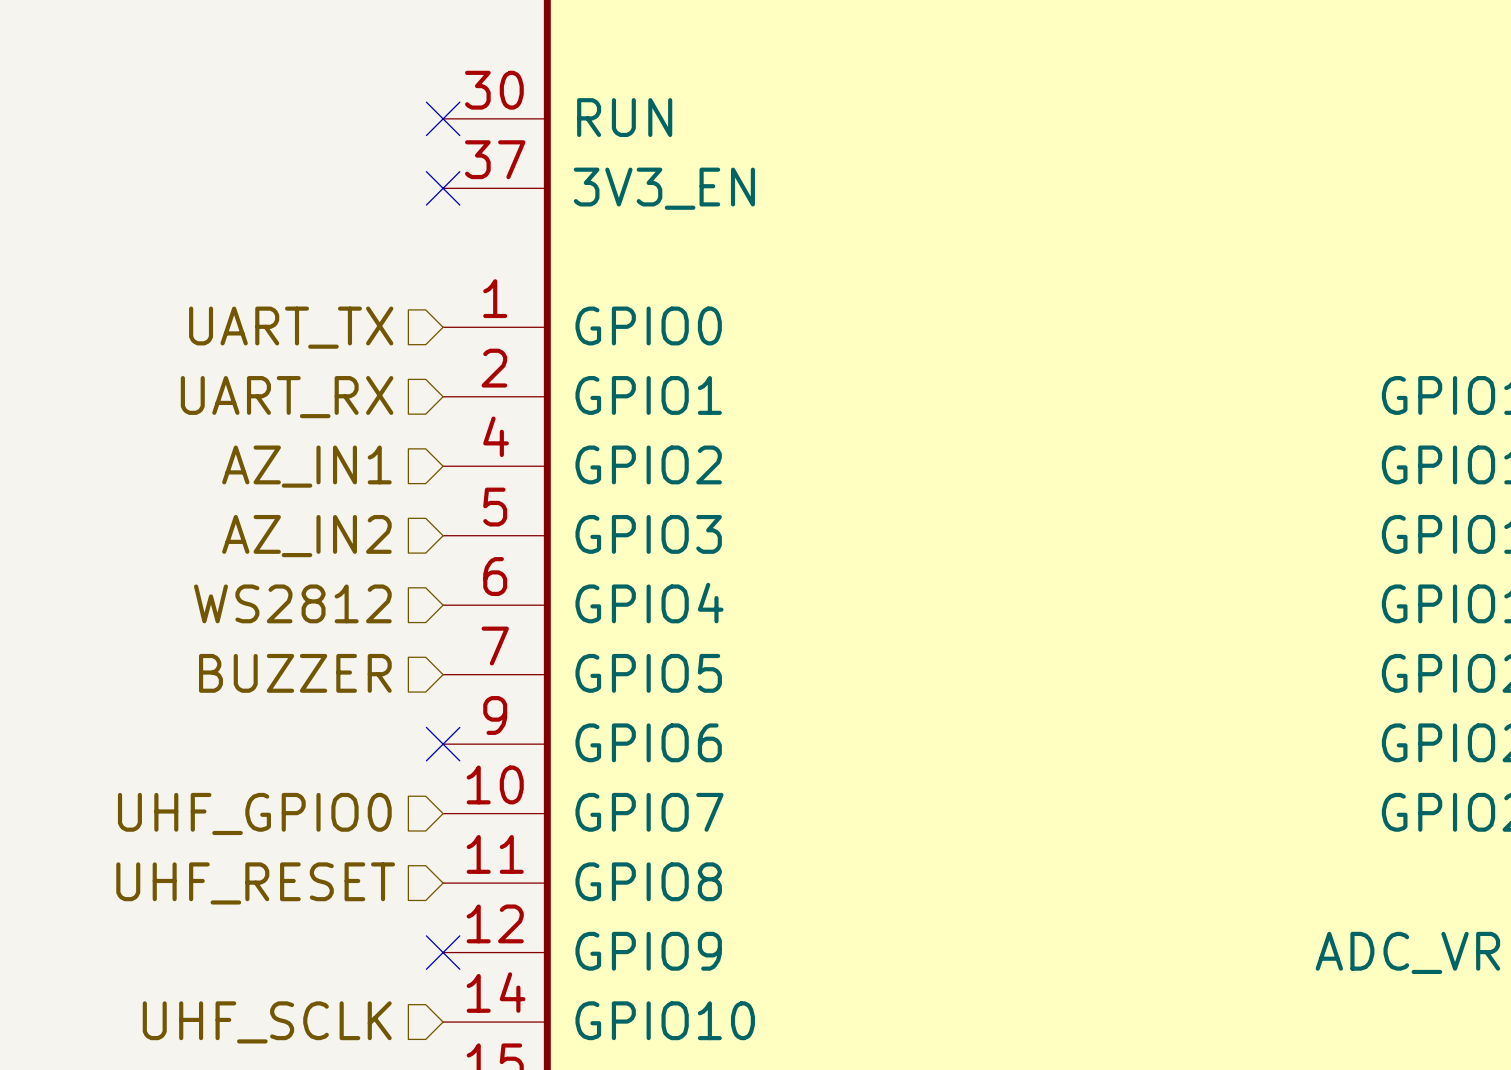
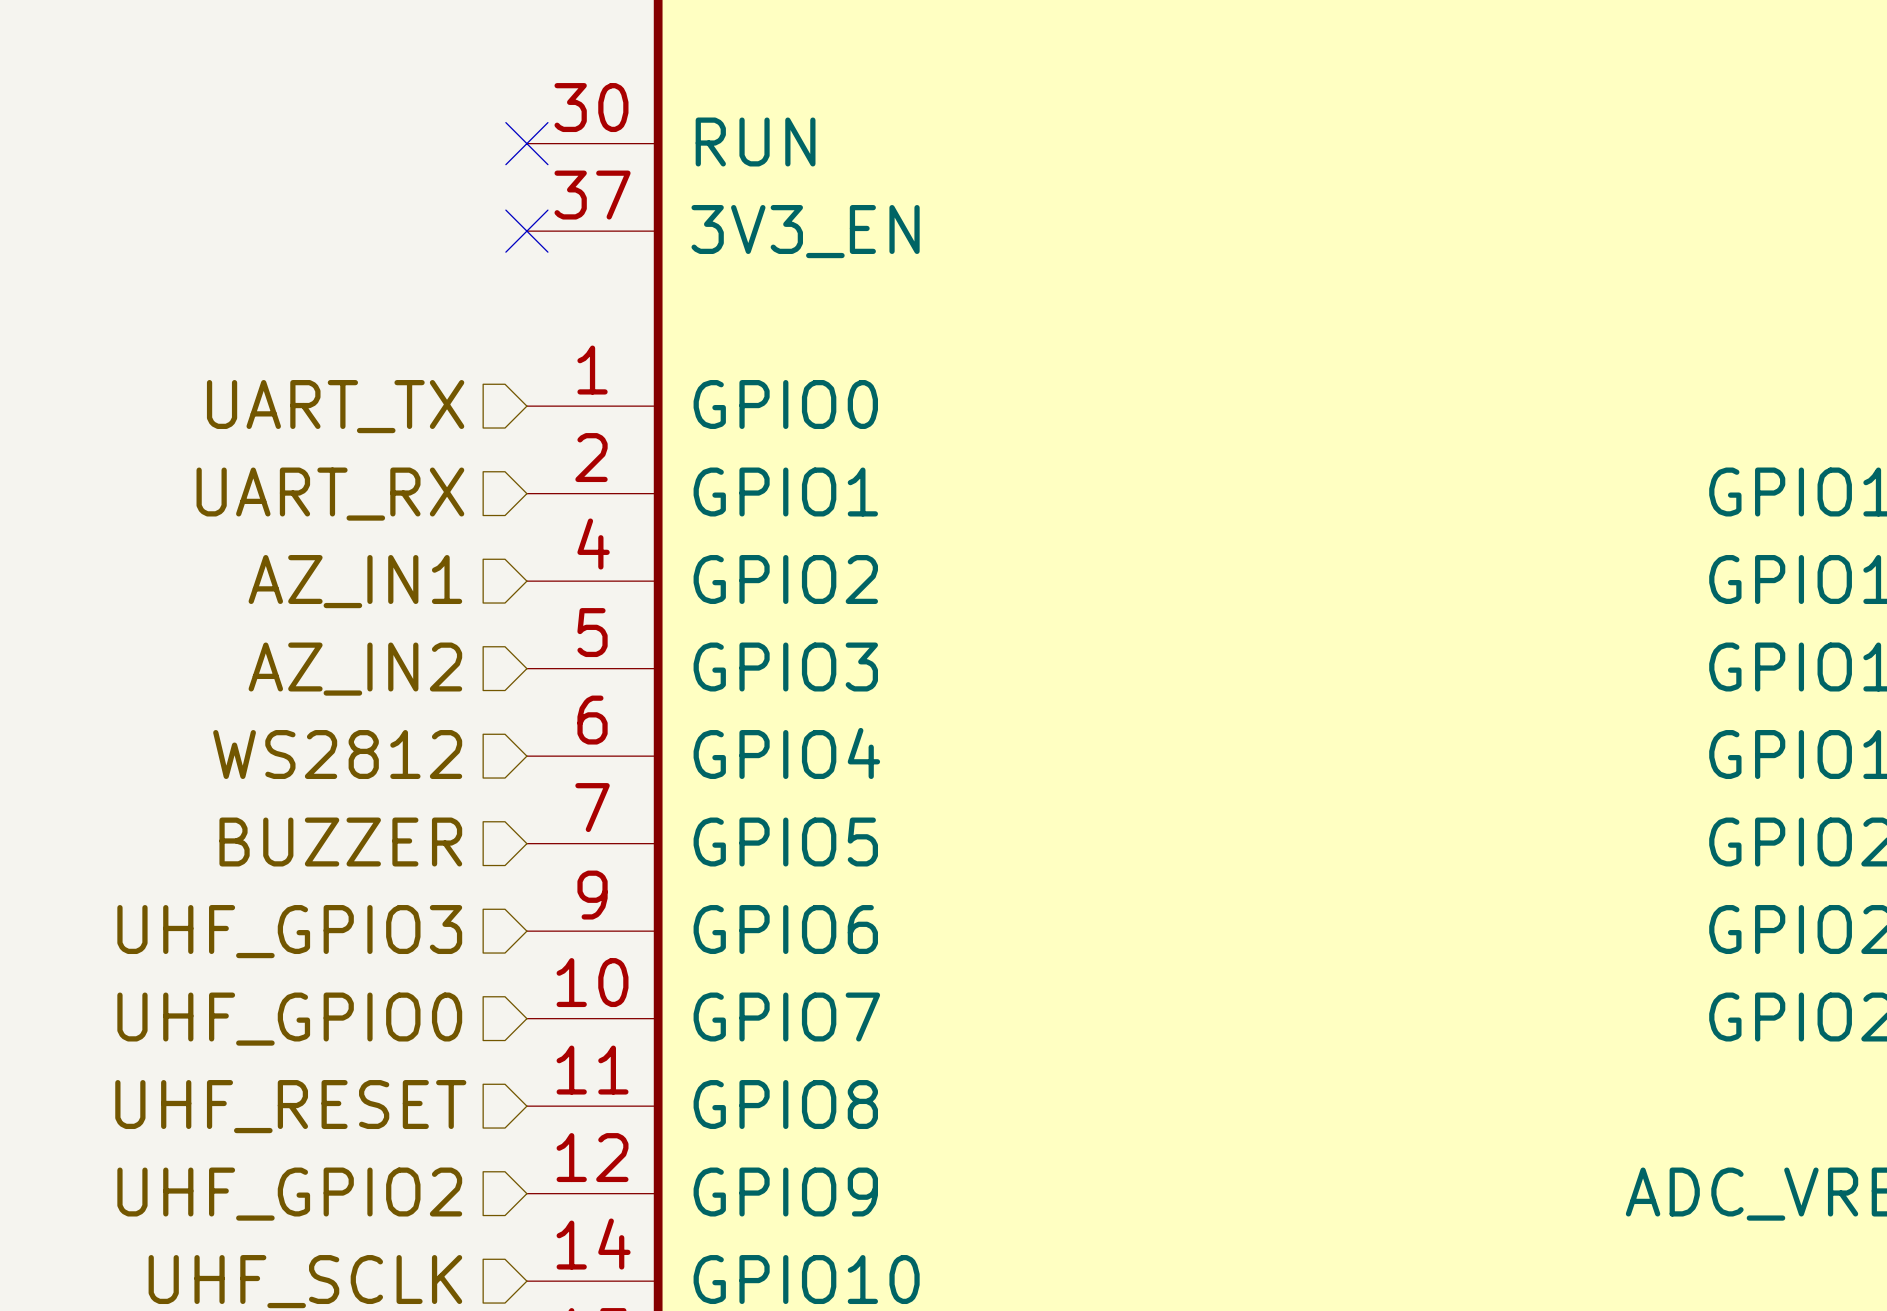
hierarchical label: none -> UHF_GPIO3 (289, 931)
no-connect mark: (443, 744) -> none
hierarchical label: none -> UHF_GPIO2 (289, 1194)
no-connect mark: (443, 952) -> none

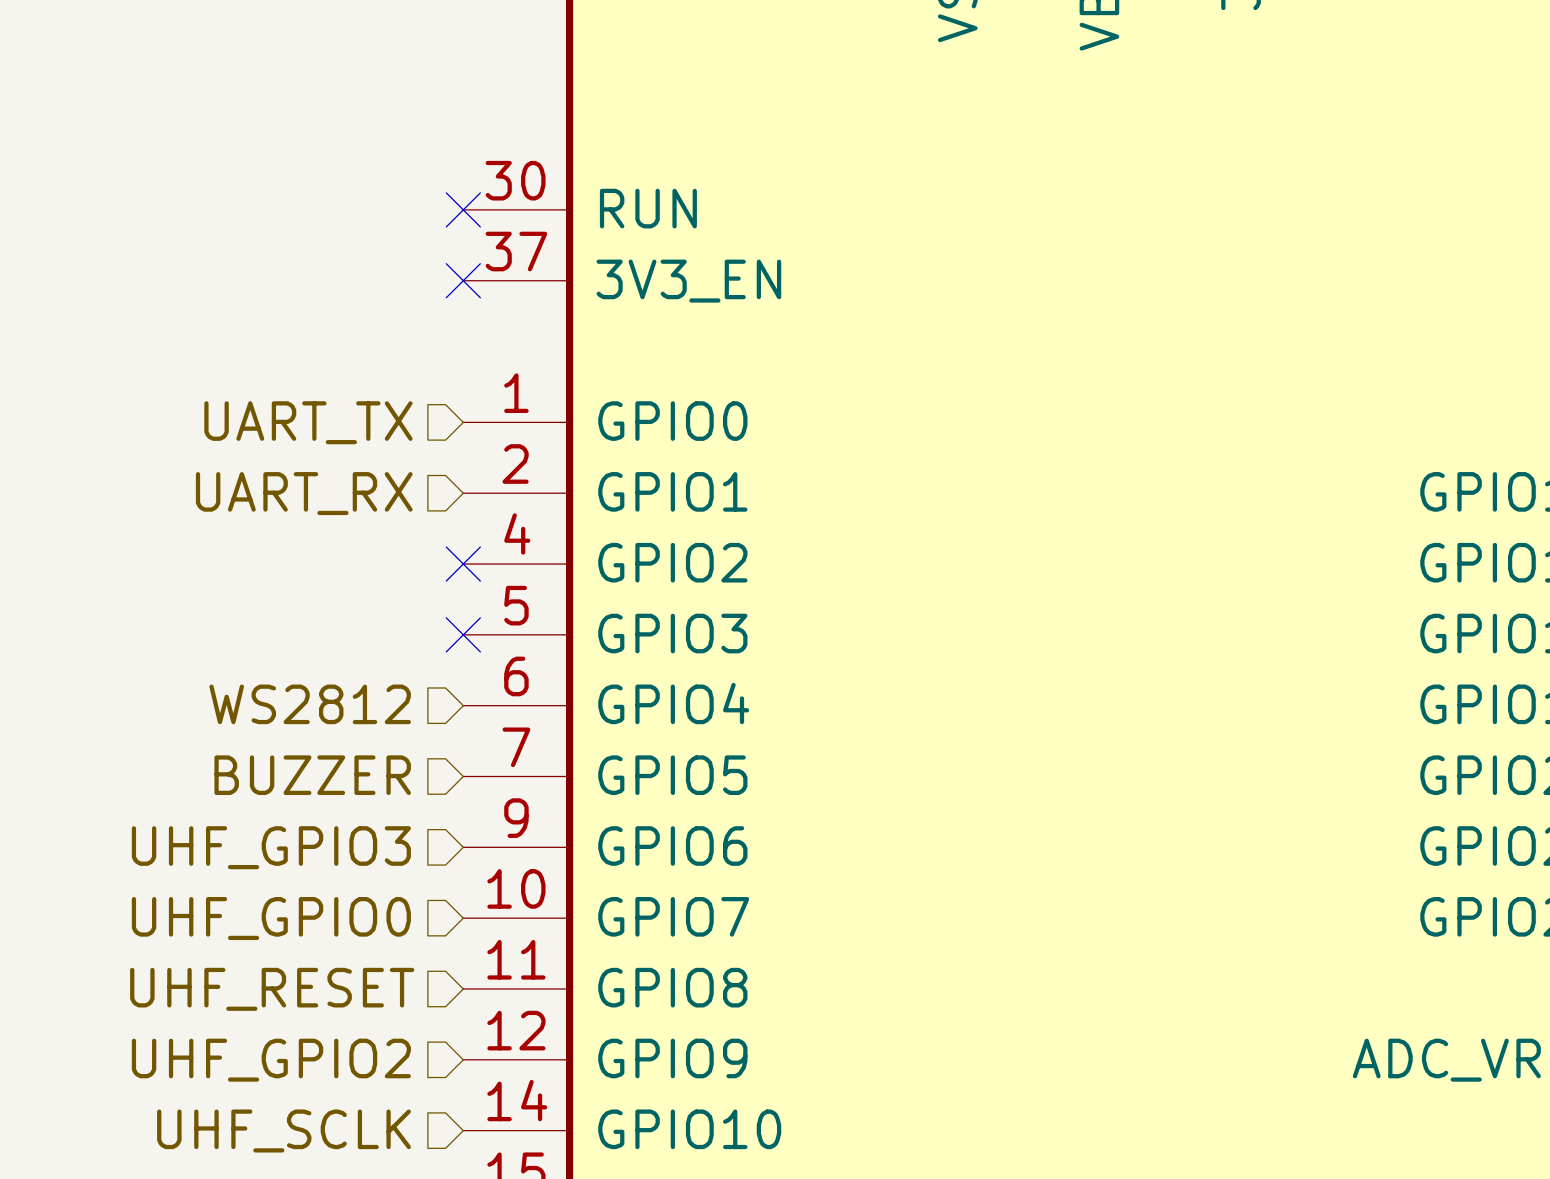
hierarchical label: AZ_IN1 (355, 581) -> none
no-connect mark: none -> (463, 564)
no-connect mark: none -> (463, 634)
hierarchical label: AZ_IN2 (355, 669) -> none

